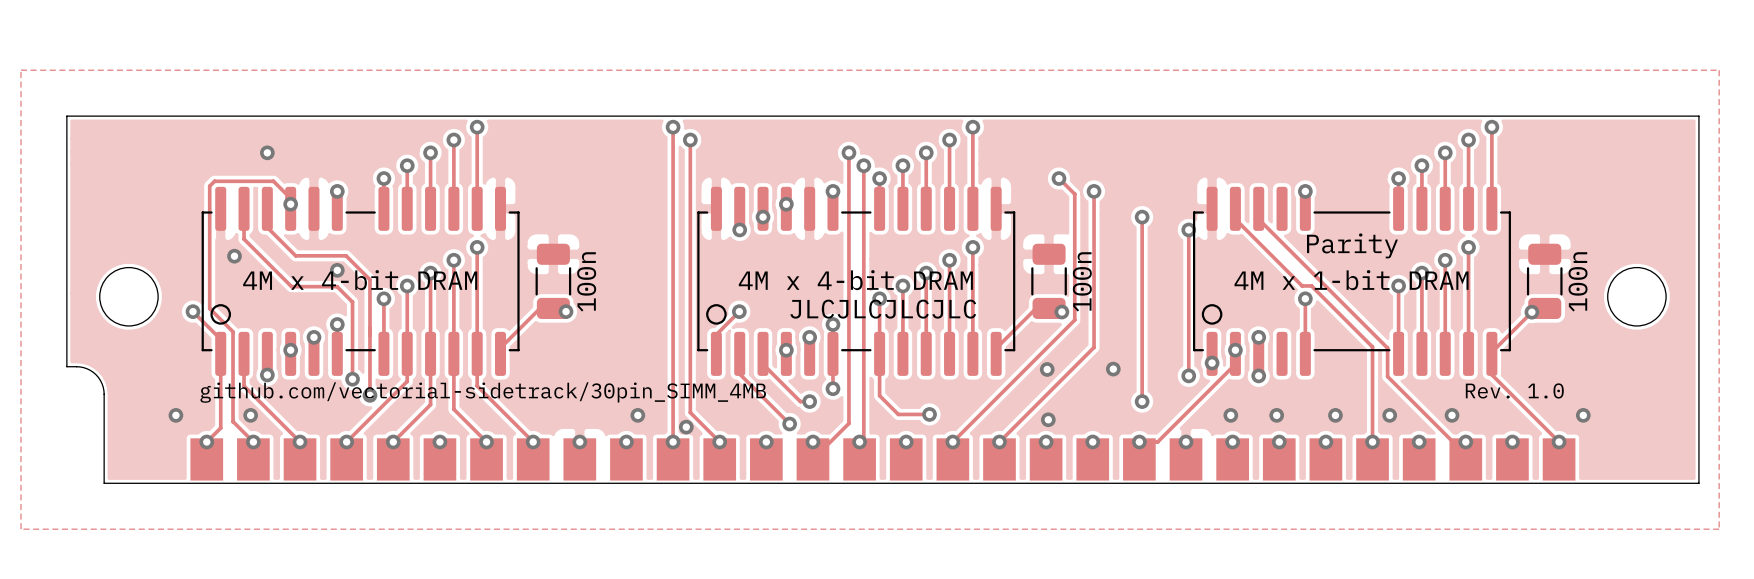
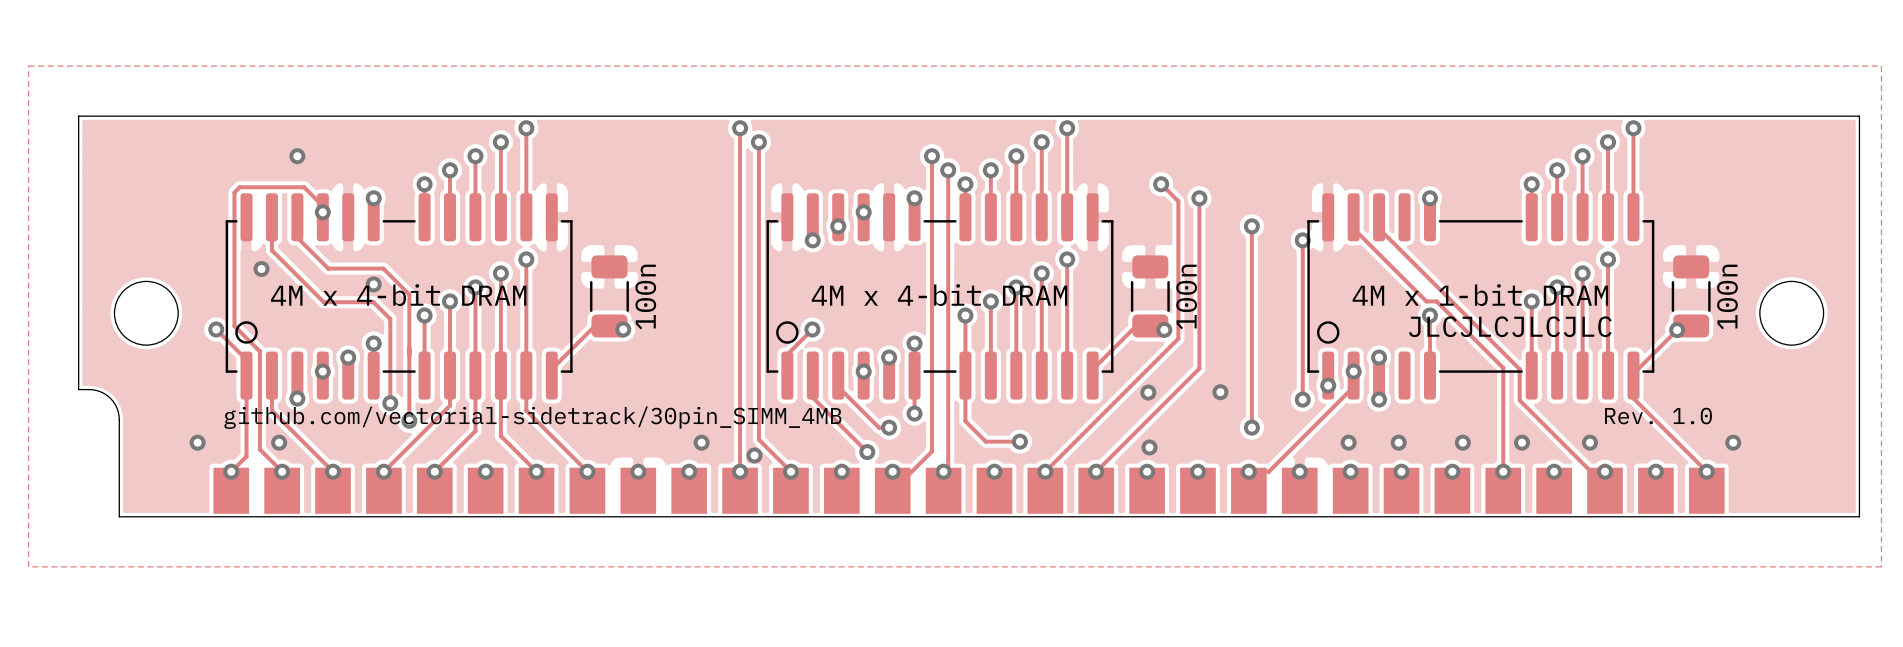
text: Parity (1352, 245) -> none
text: JLCJLCJLCJLC (883, 309) -> none
text: none -> JLCJLCJLCJLC (1510, 326)

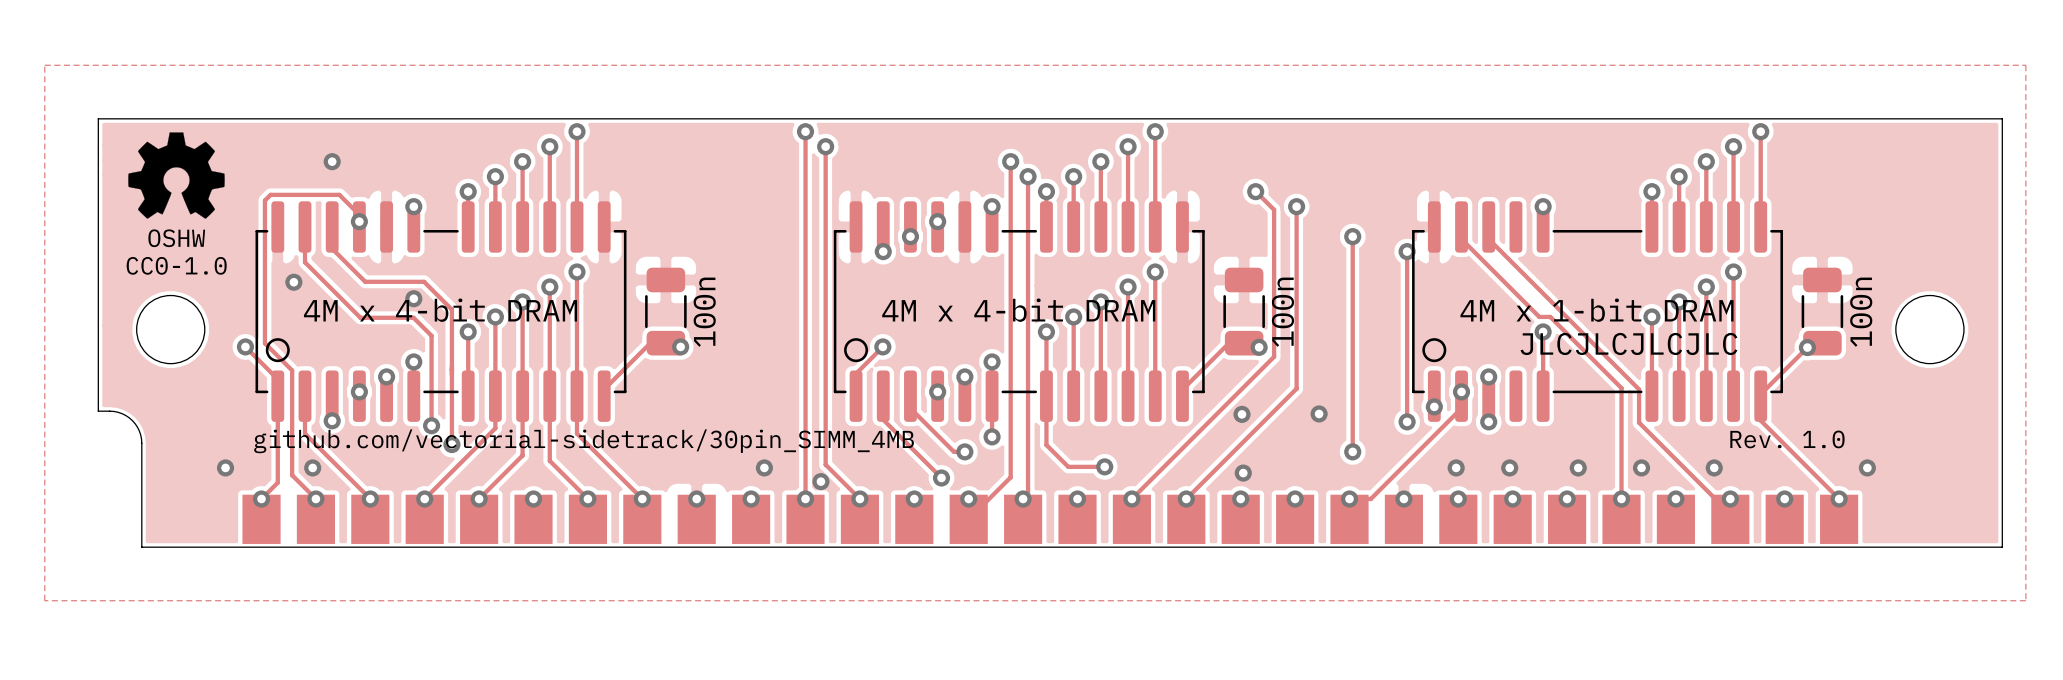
drawing: none -> [128, 132, 225, 219]
text: none -> OSHW (176, 238)
text: none -> CC0-1.0 (176, 265)

